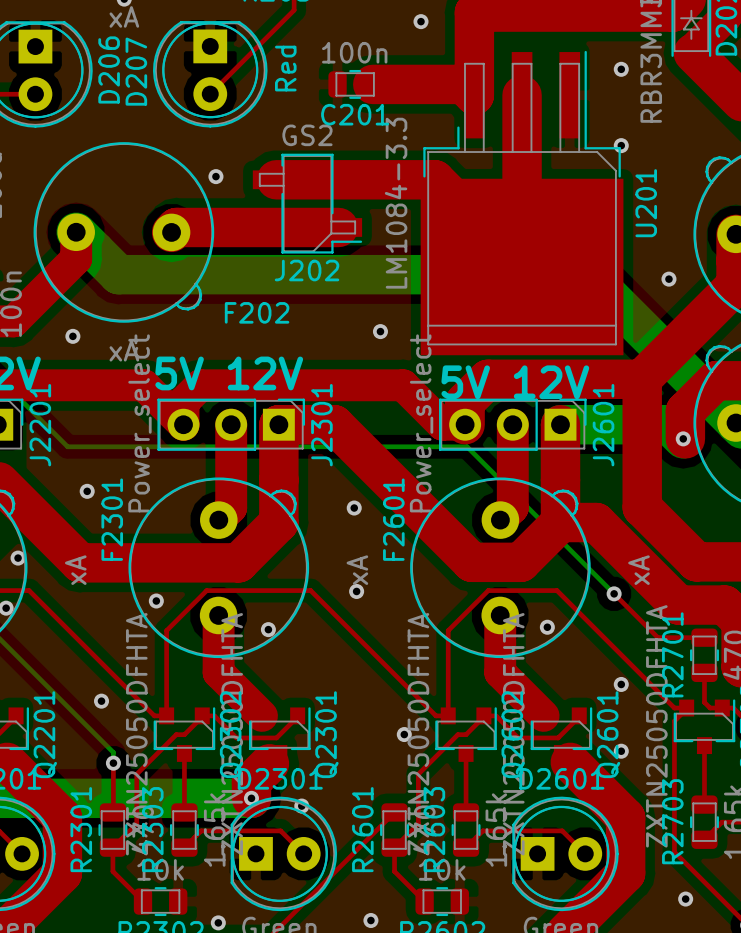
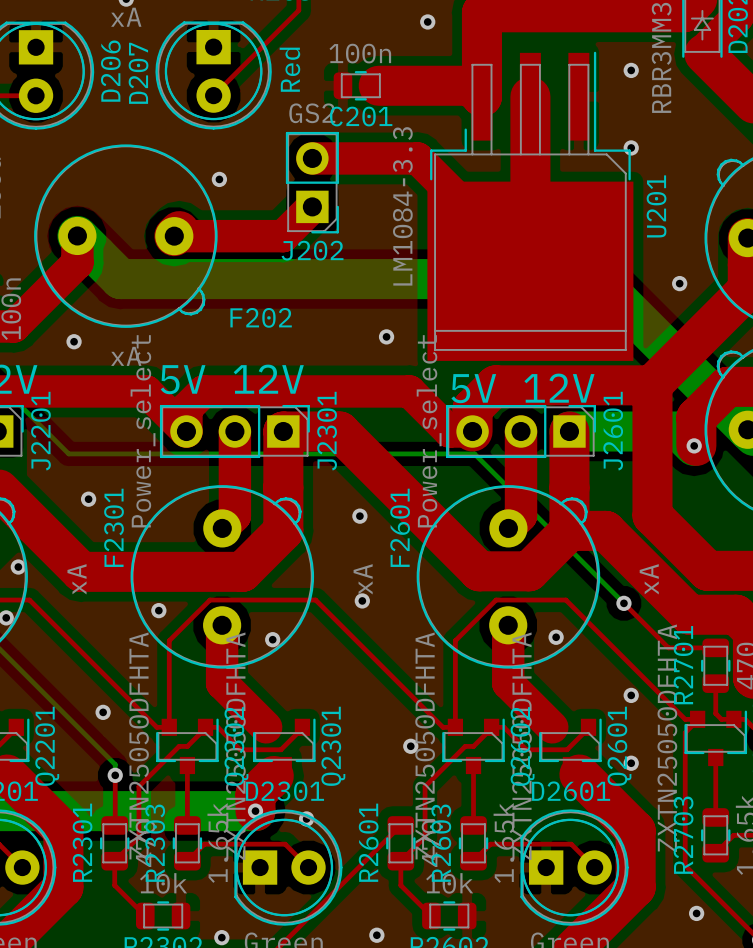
J202 footprint: [252, 153, 363, 254] -> [285, 131, 339, 234]
top track: (276, 179) (434, 179) -> (312, 158) (417, 158) (441, 182)
top track: none -> (312, 206) (283, 236) (174, 236)
top track: (176, 227) (338, 227) -> none

